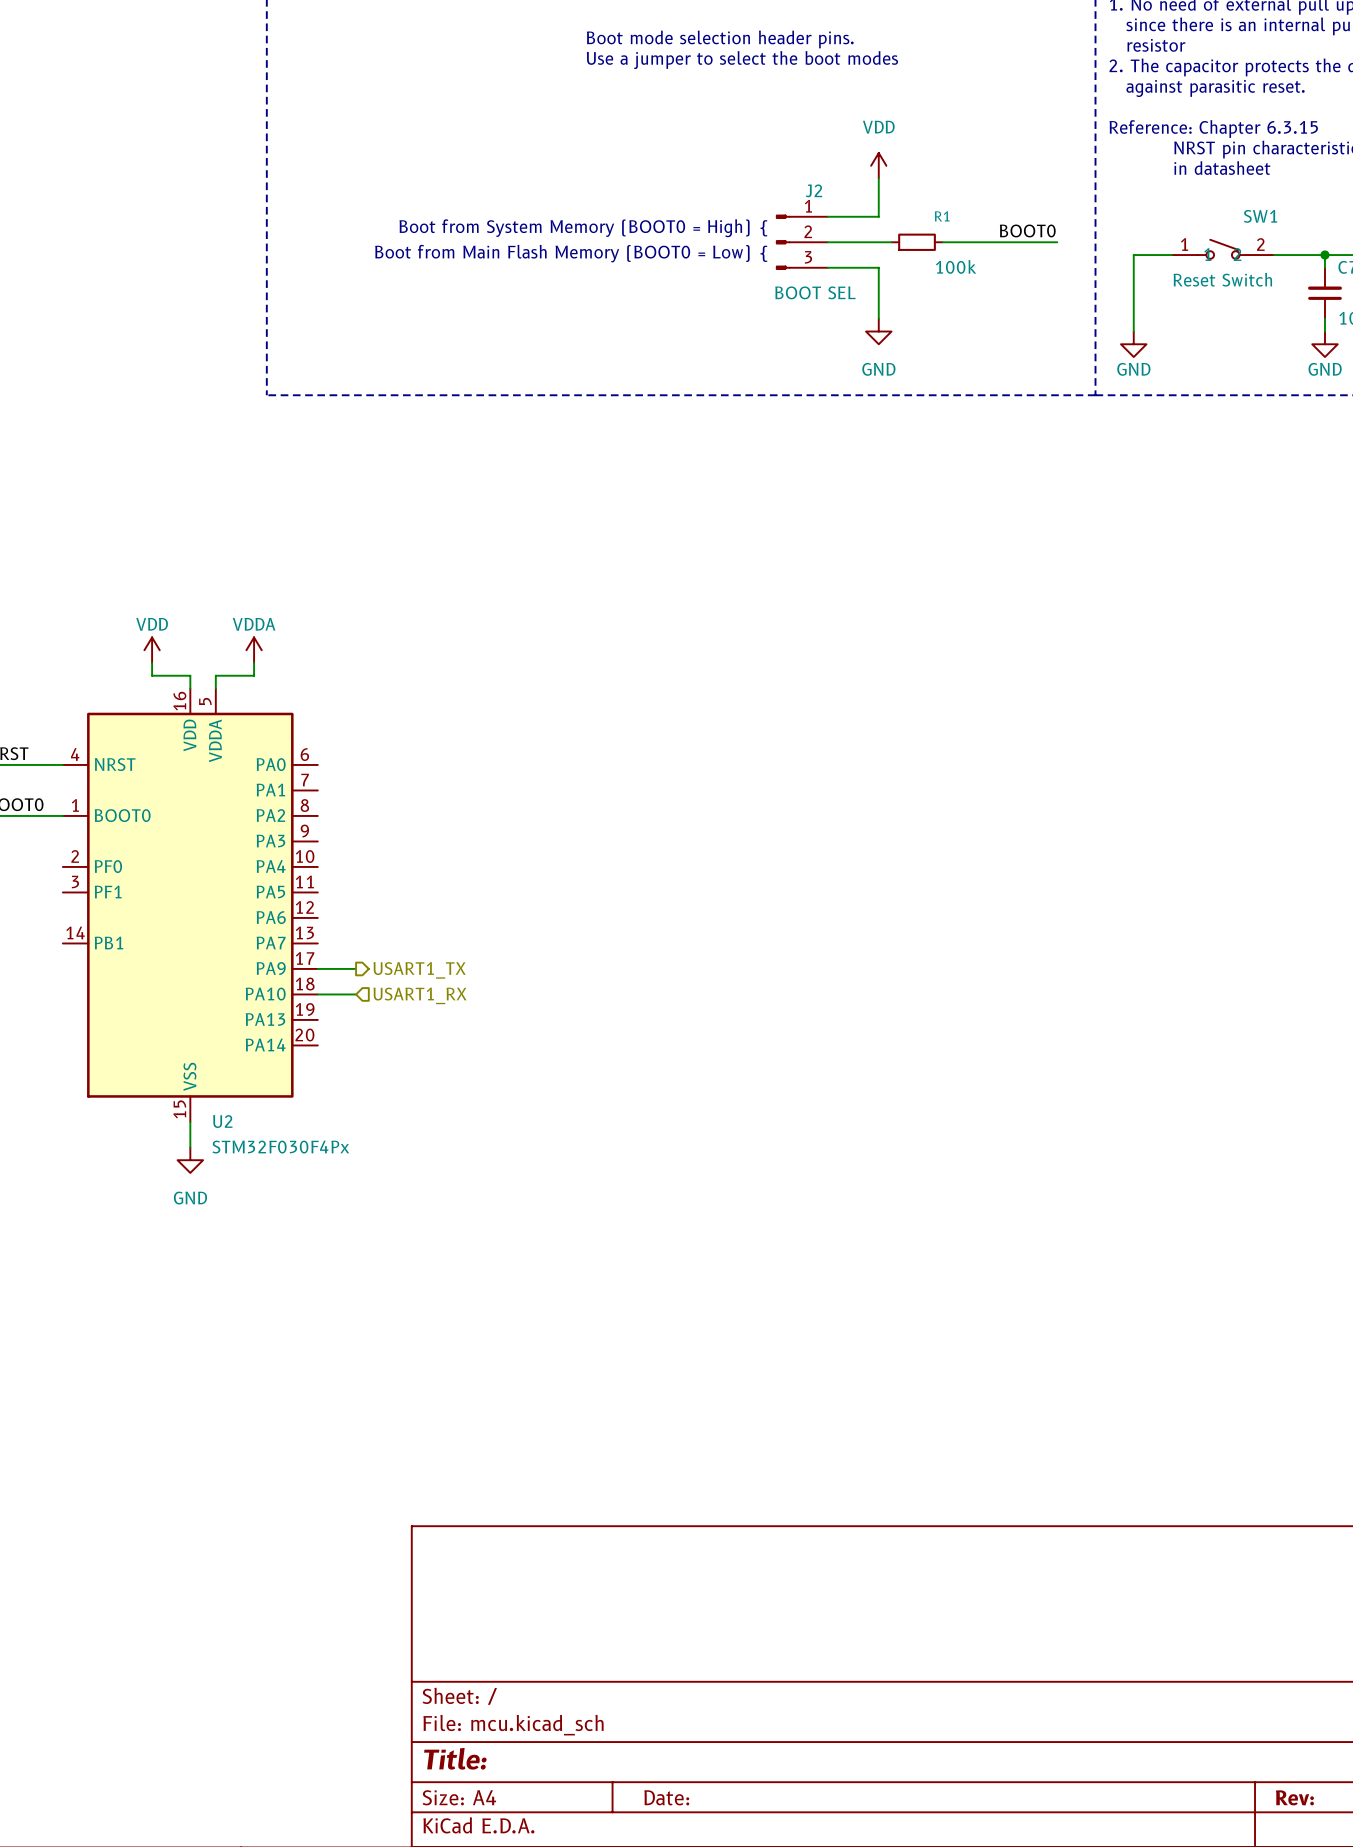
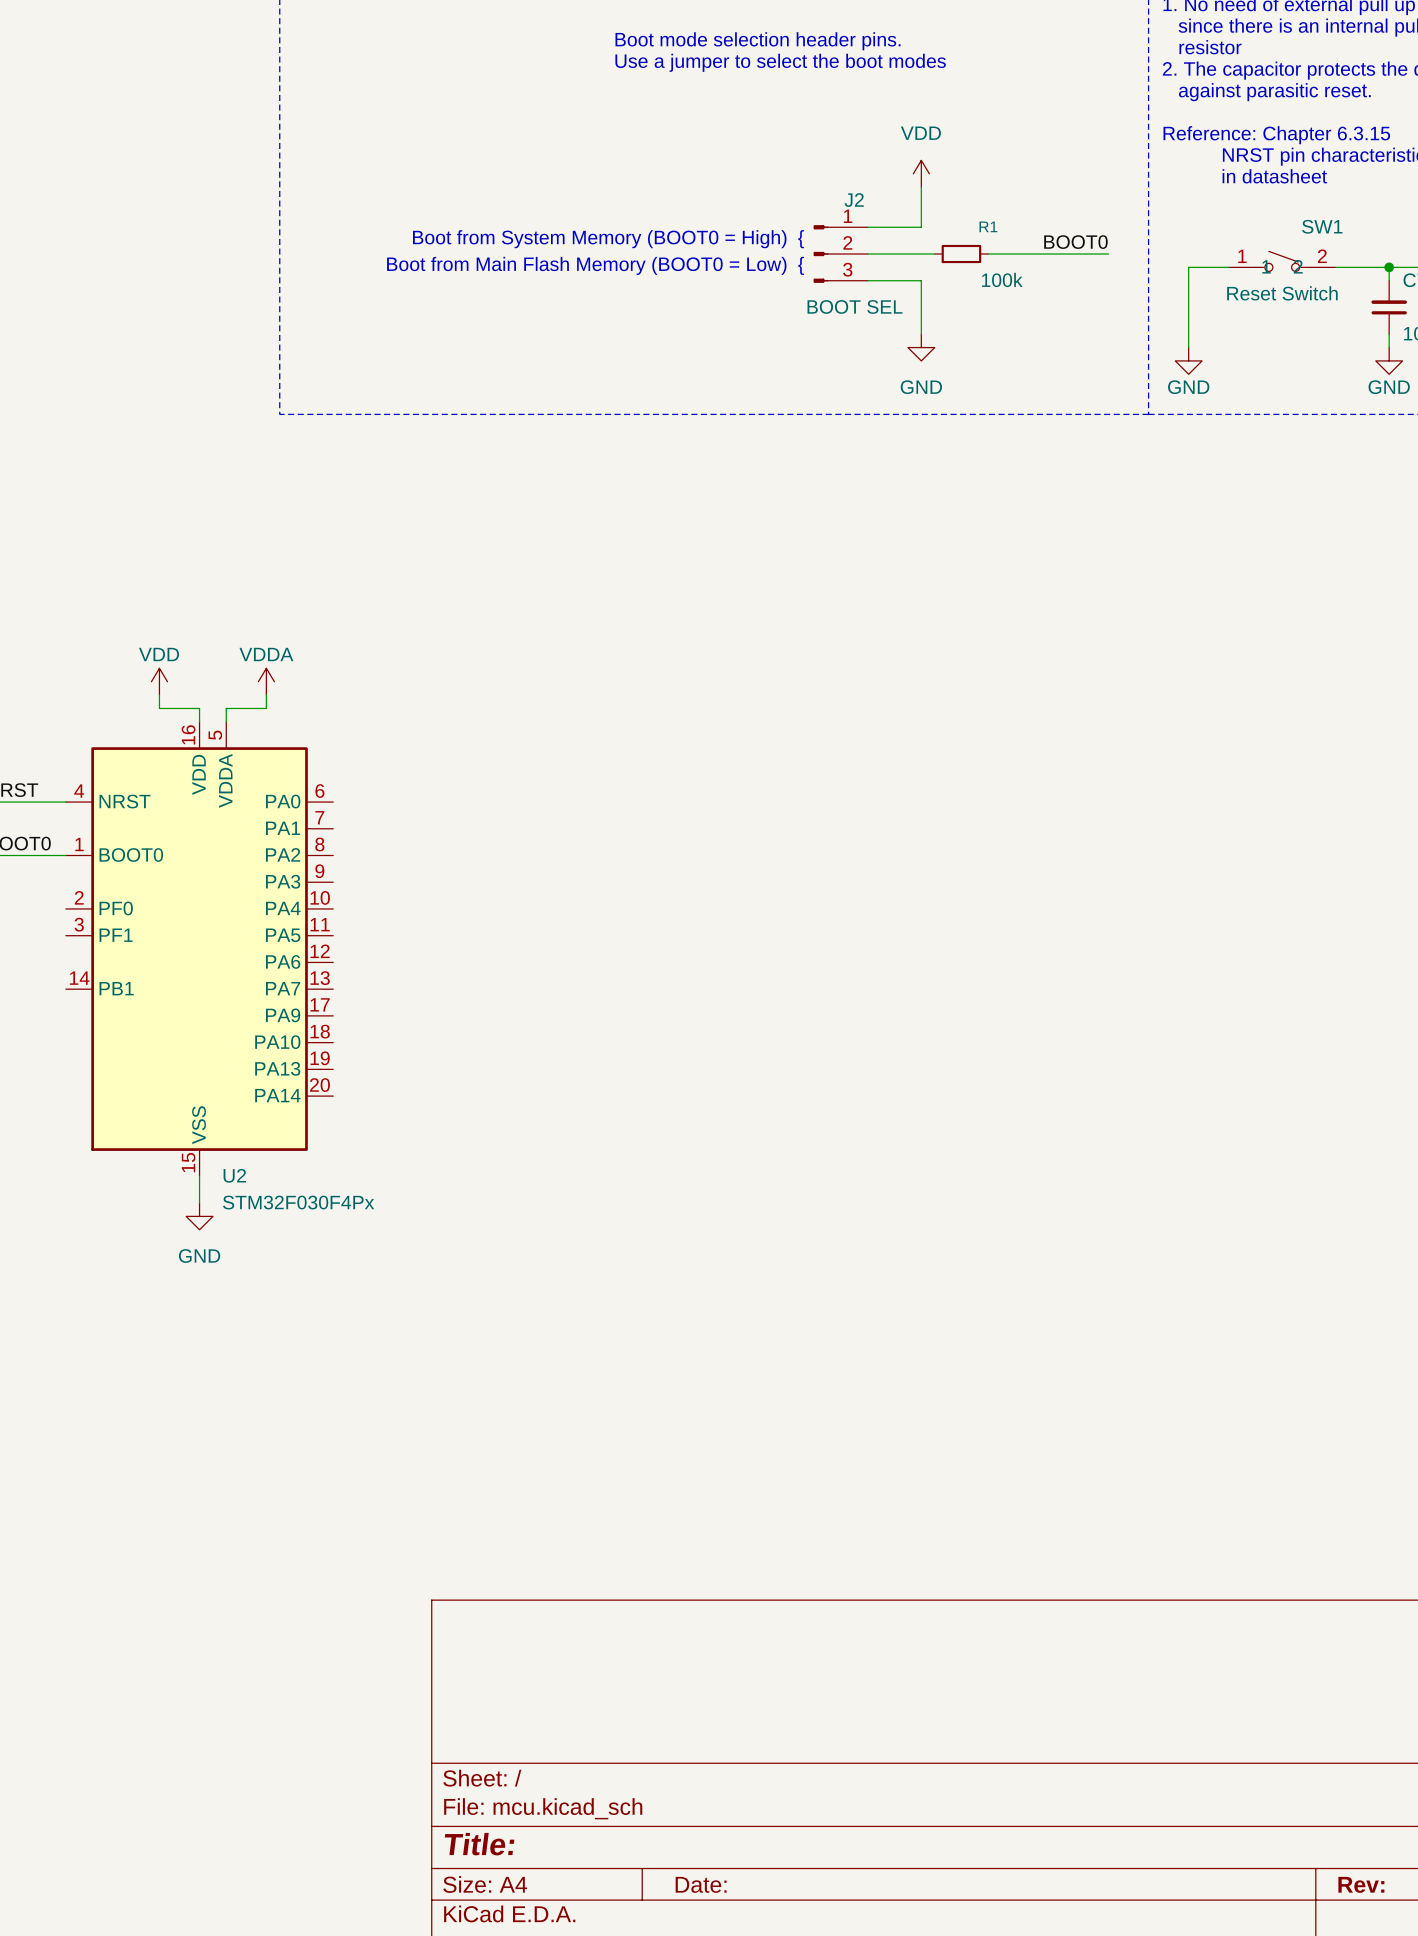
wire: (317, 968) (356, 968) -> none
hierarchical label: USART1_TX (419, 970) -> none
wire: (317, 994) (356, 994) -> none
hierarchical label: USART1_RX (420, 995) -> none

